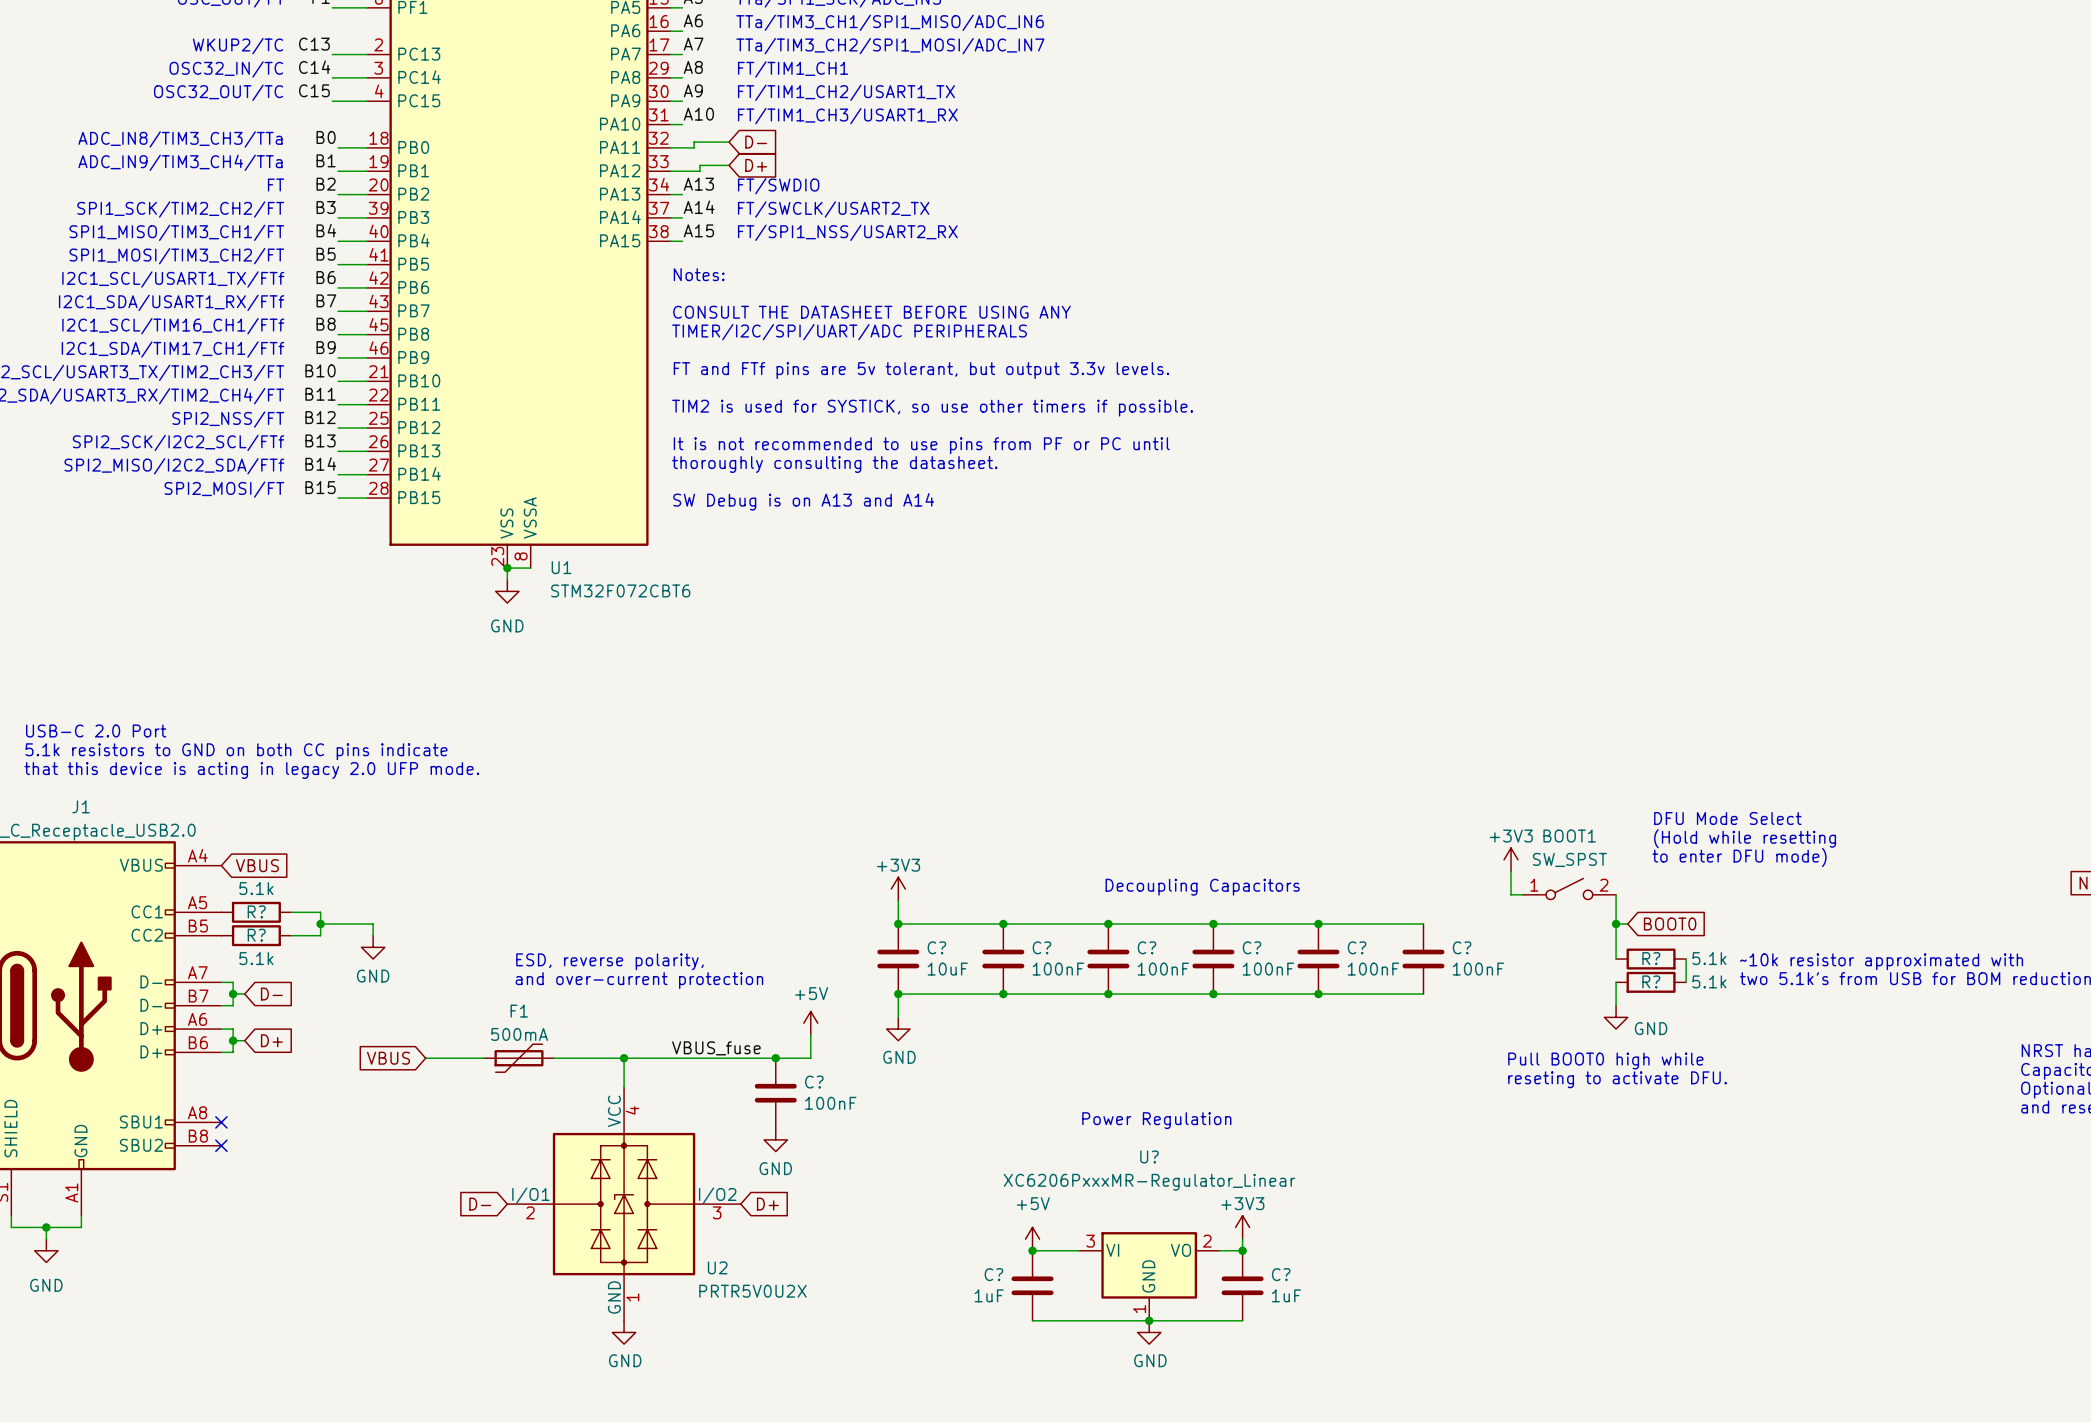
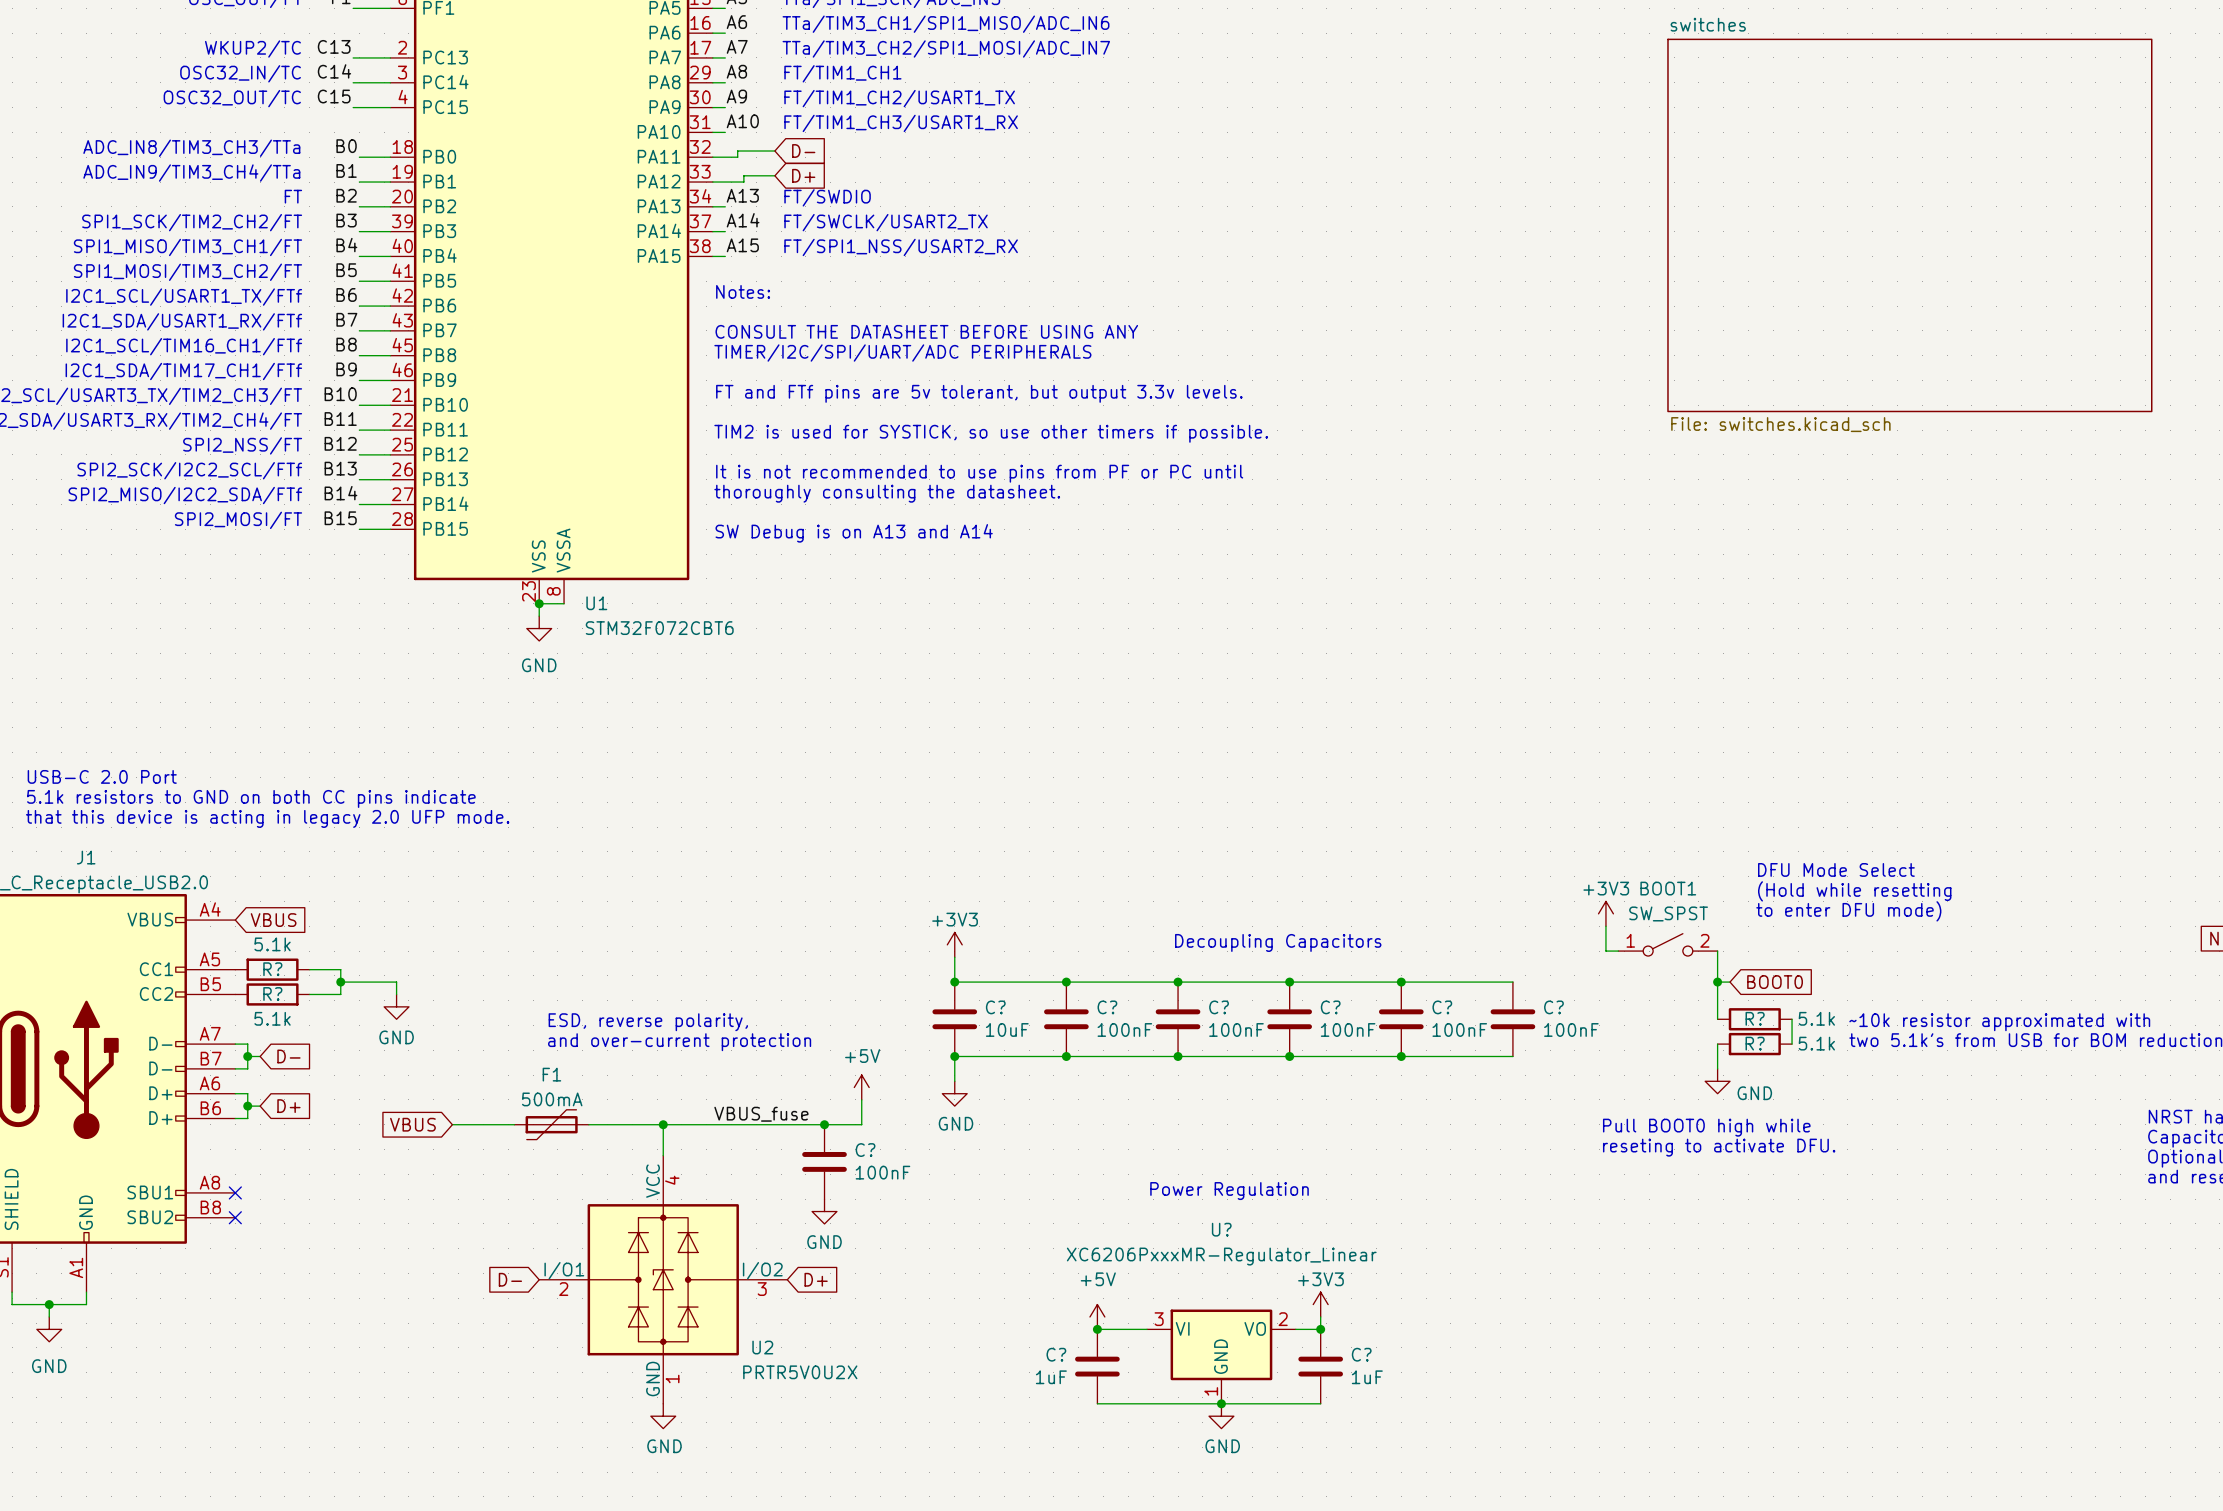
sheet switches: none -> File: switches.kicad_sch (1909, 225)

